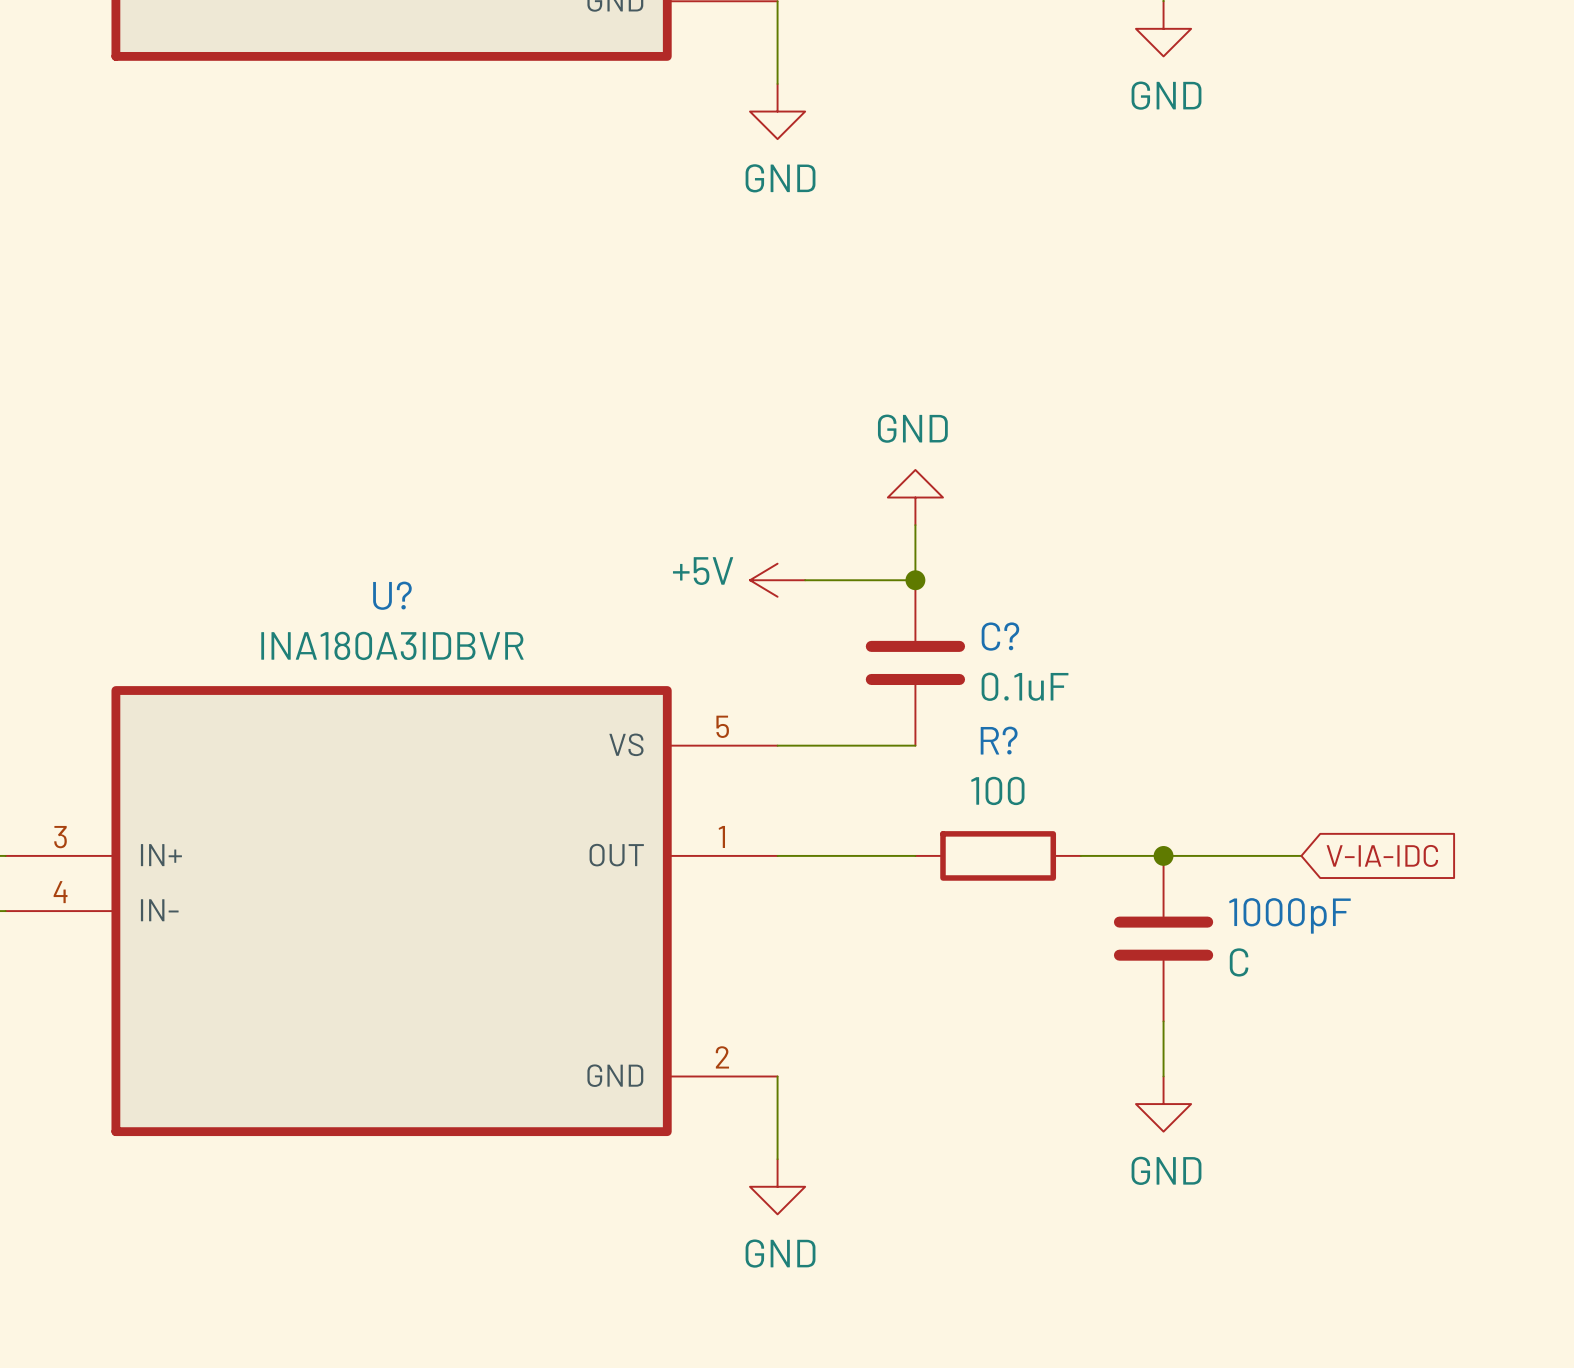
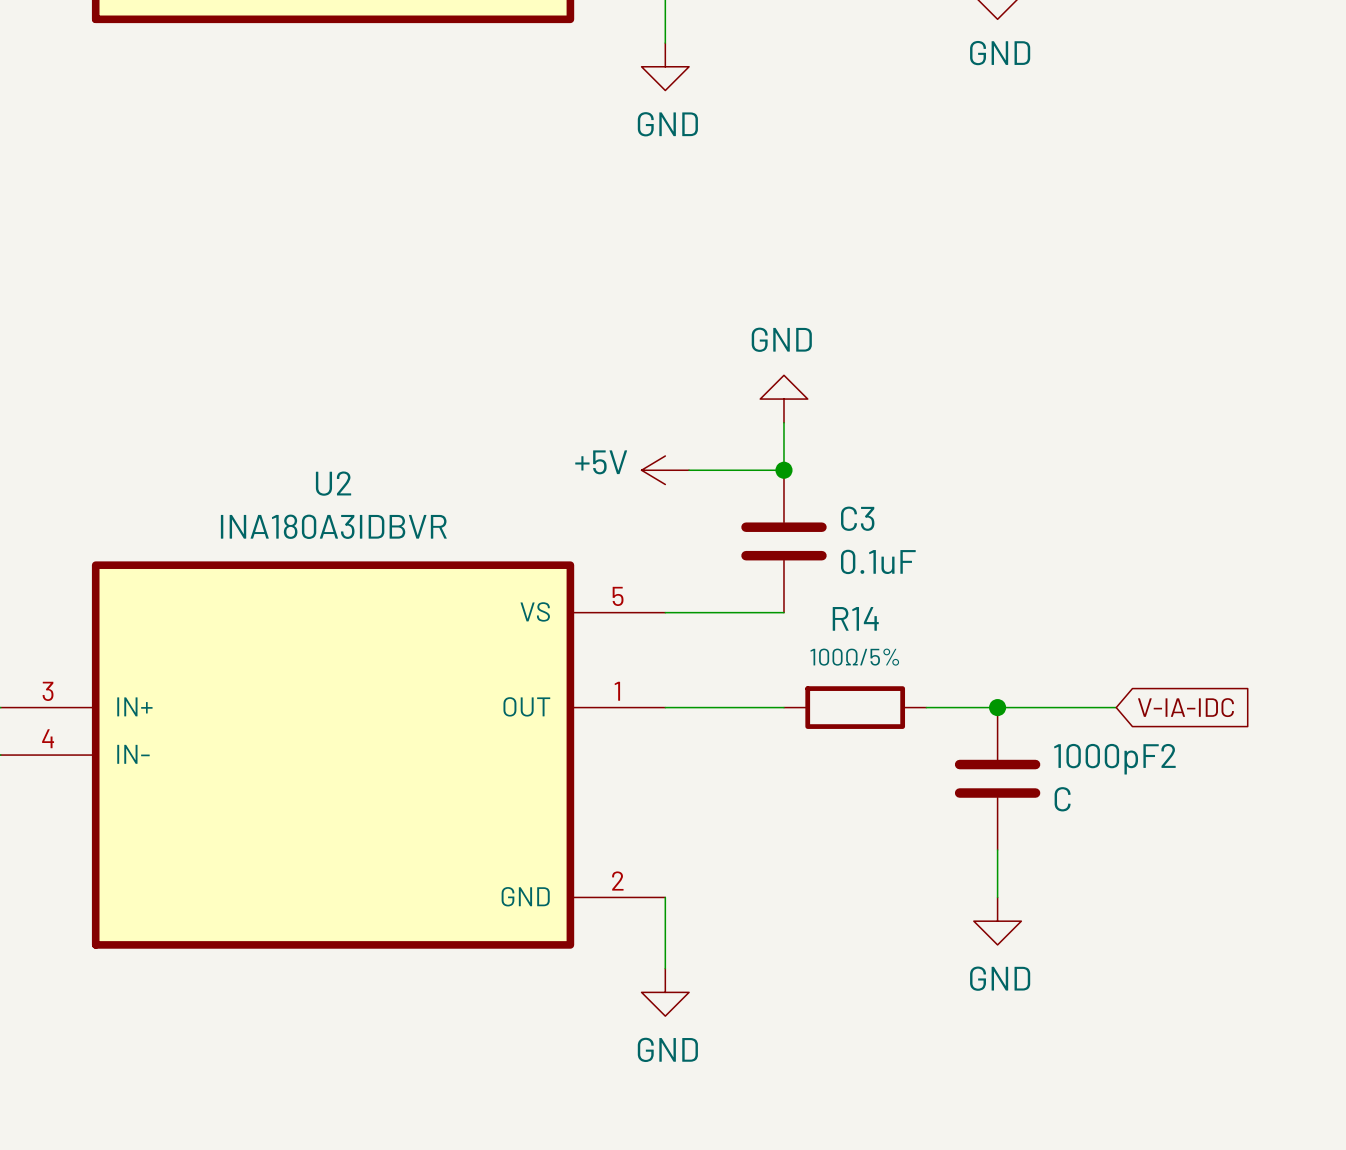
U? name: U? (392, 595) -> U2 (333, 483)
C? name: C? (1000, 636) -> C3 (857, 518)
R? name: R? (999, 740) -> R14 (855, 618)
R? value: 100 (997, 790) -> 100Ω/5% (854, 657)
1000pF name: 1000pF (1290, 915) -> 1000pF2 (1114, 759)

